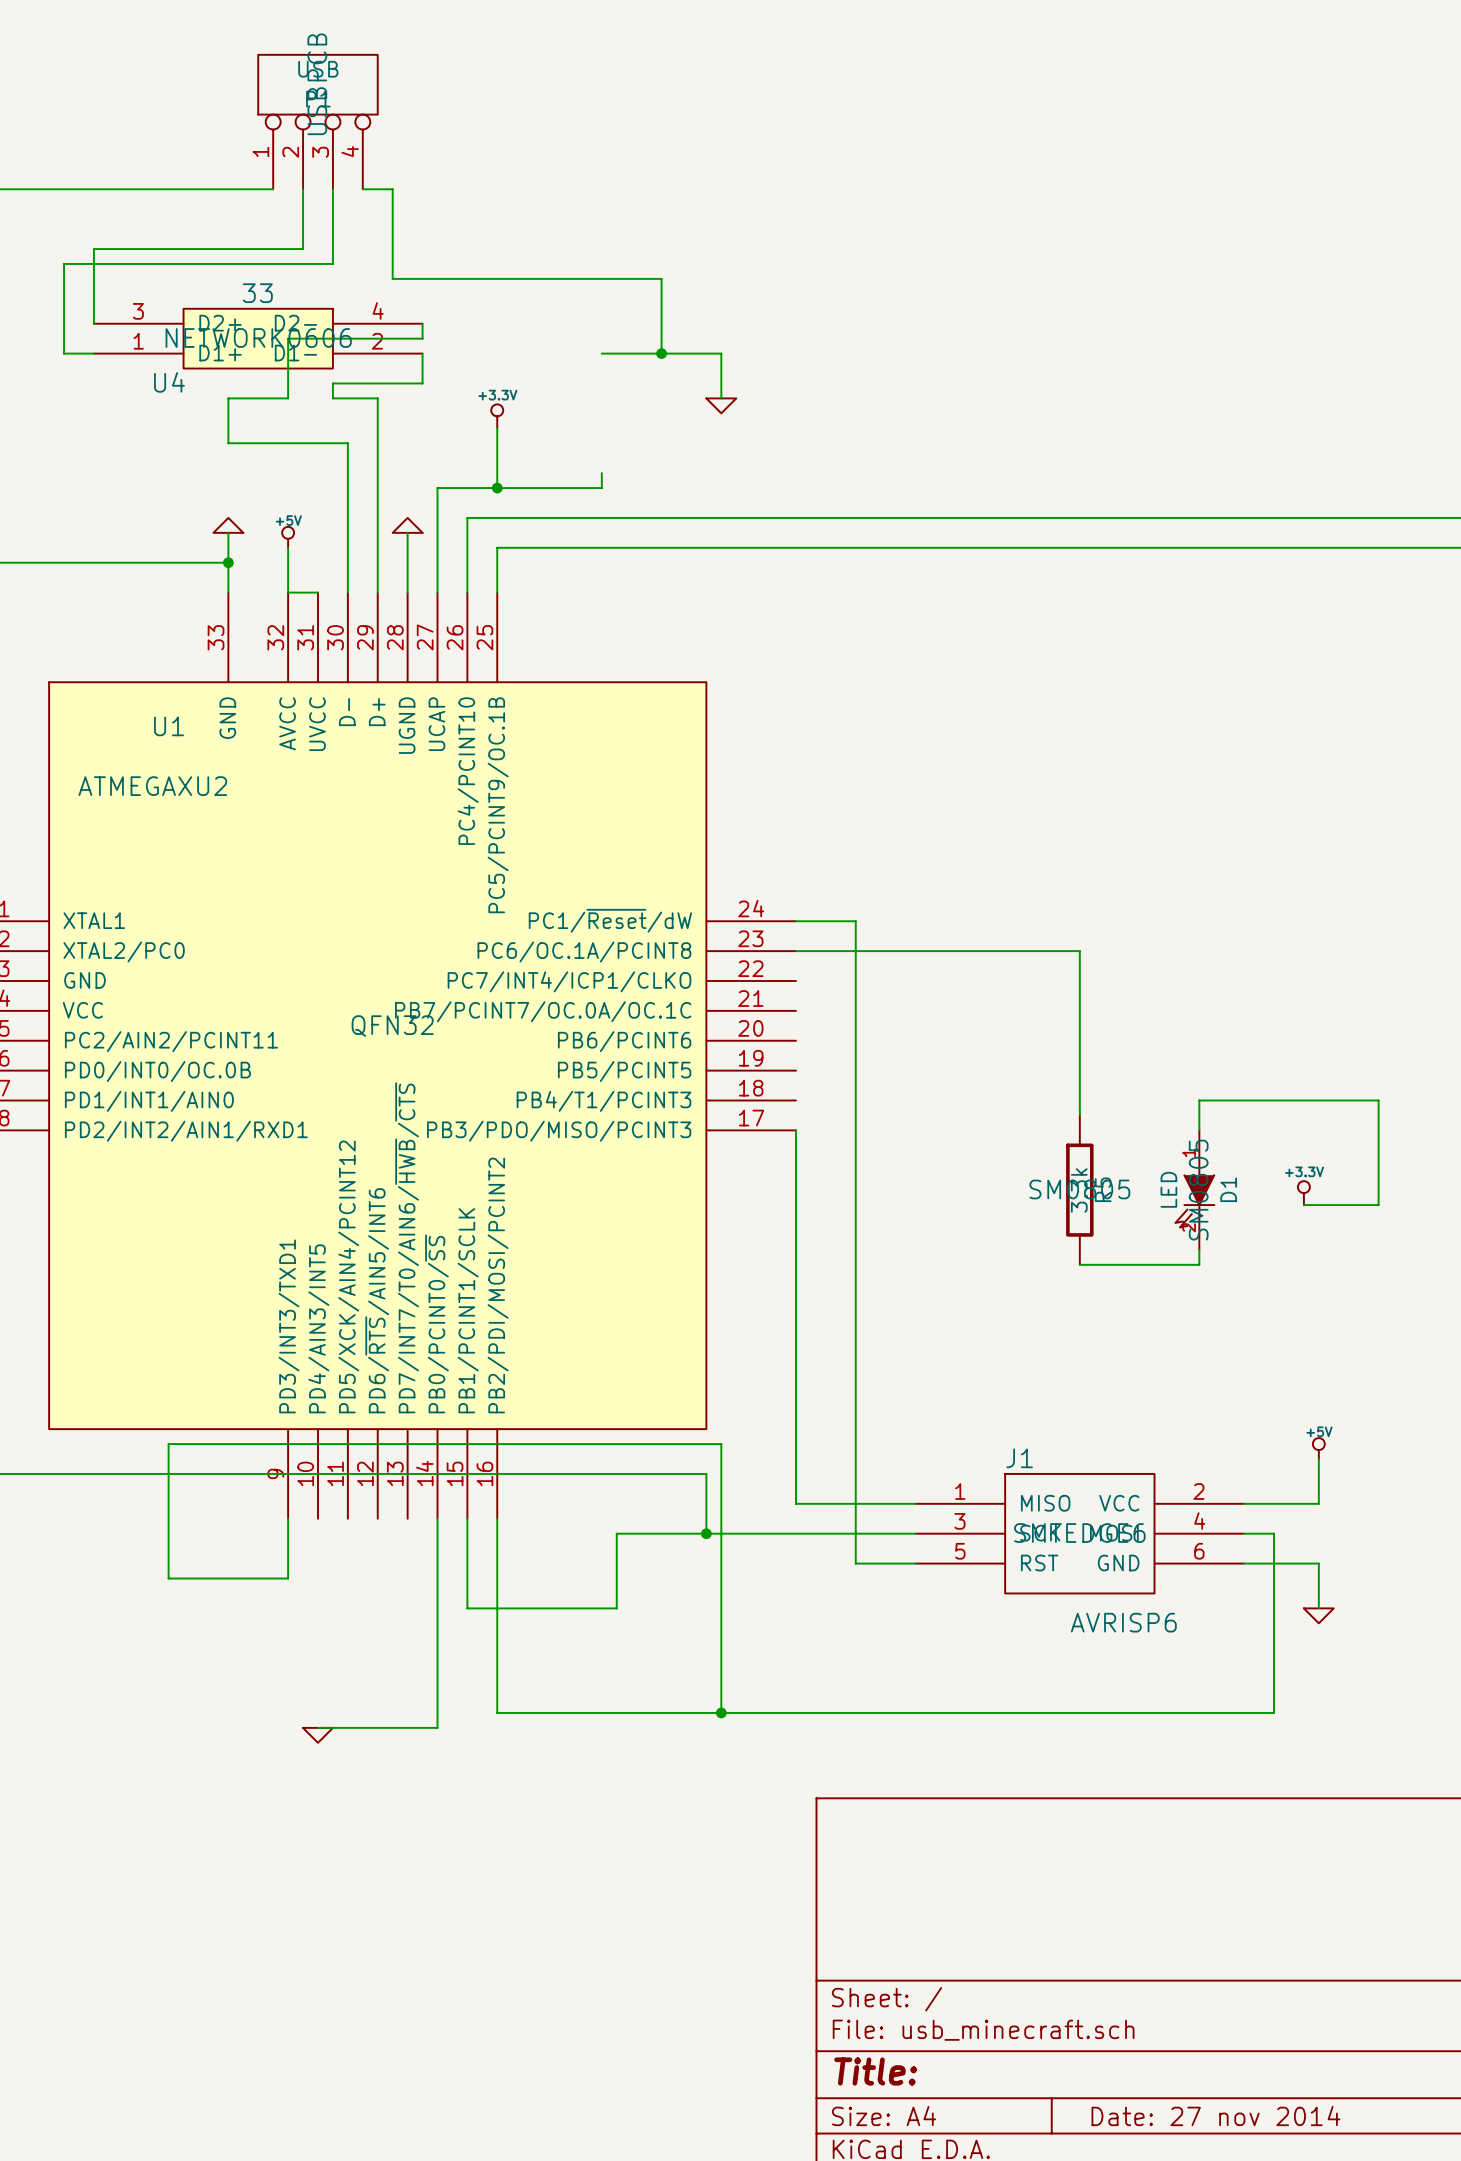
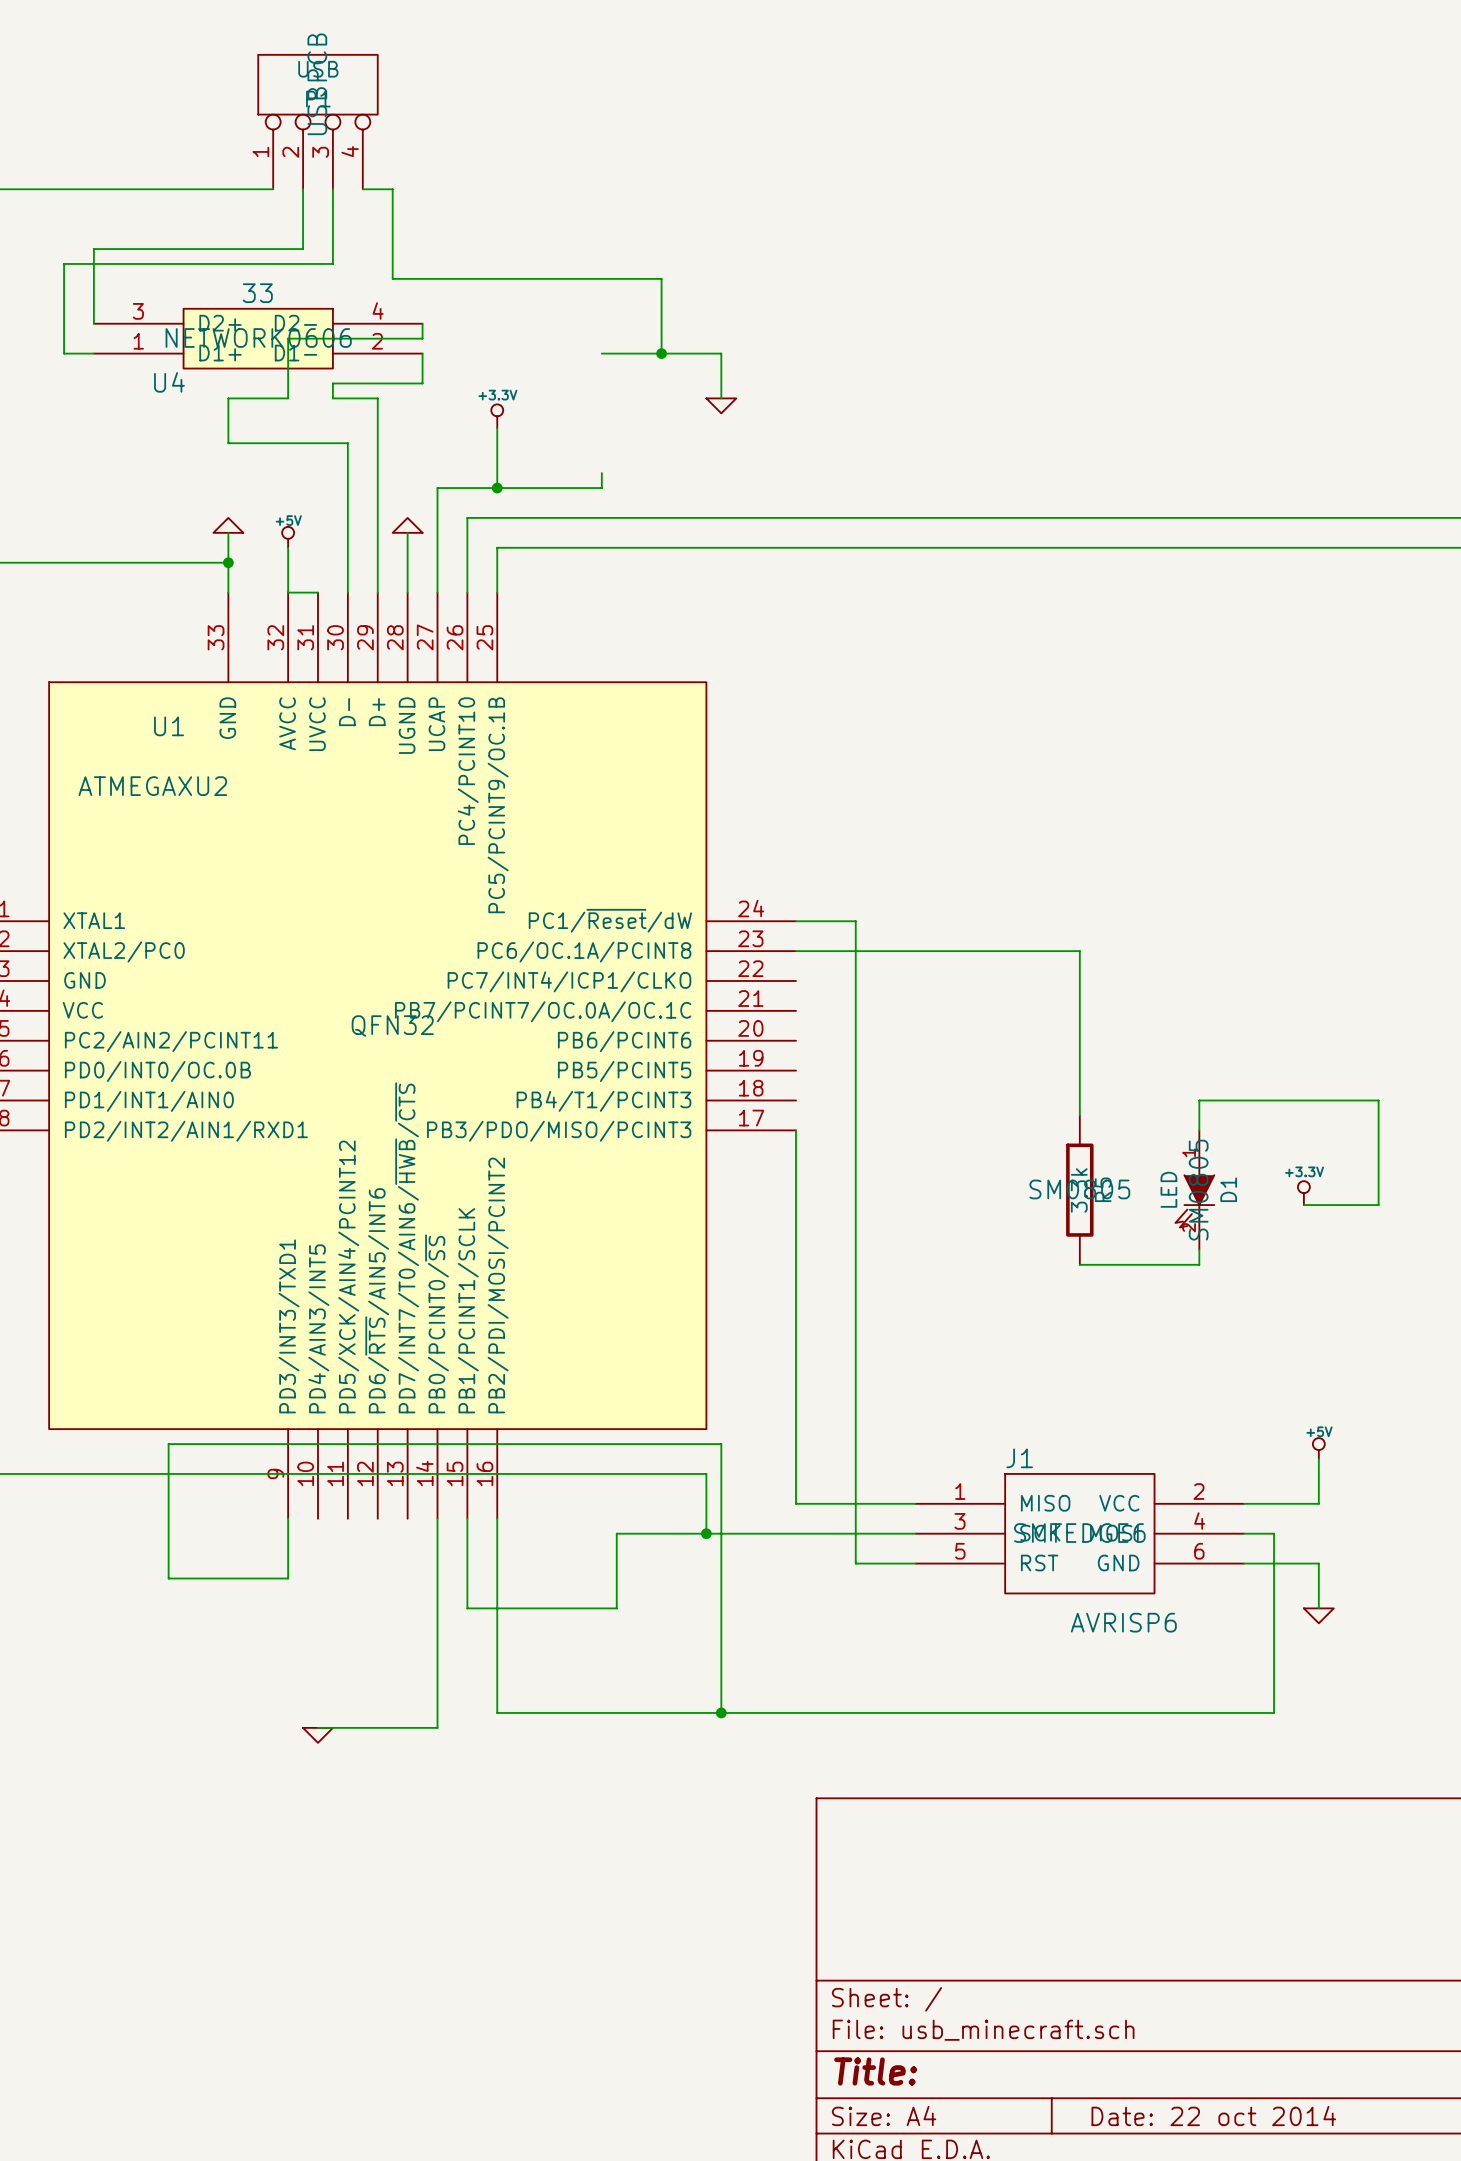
title block: Date: 27 nov 2014 (1215, 2115) -> Date: 22 oct 2014 (1213, 2115)

